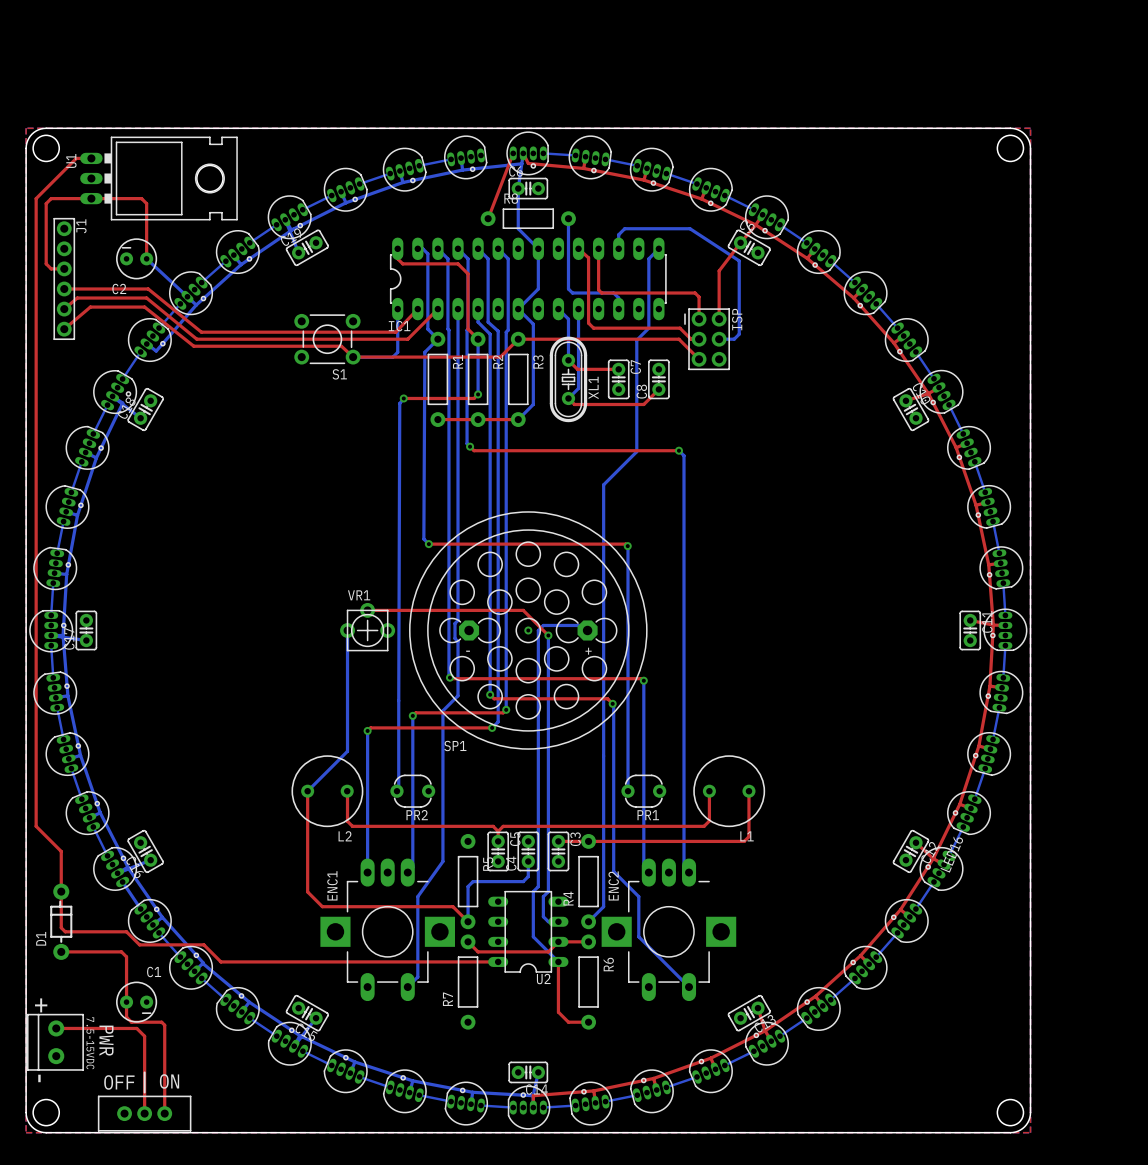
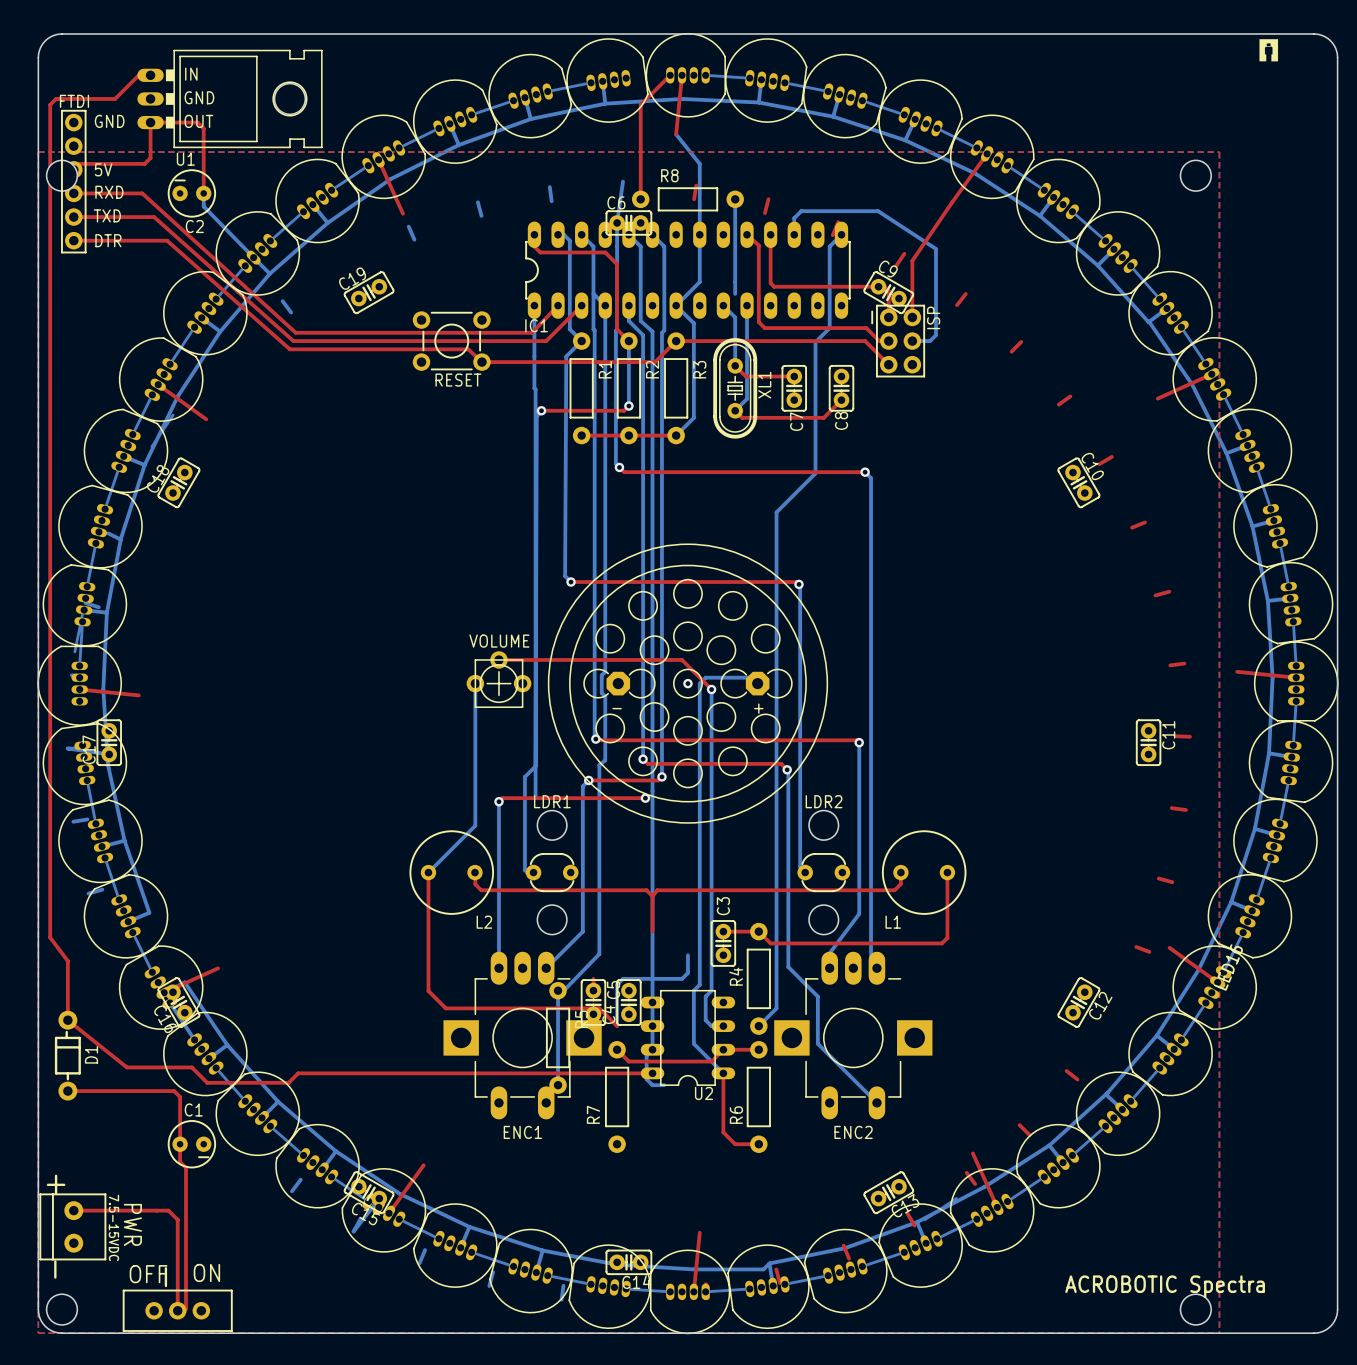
drawing: none -> [1259, 39, 1279, 62]
text: none -> IN (191, 74)
top track: none -> (670, 75) (640, 104) (640, 199)
top track: none -> (682, 75) (676, 134)
part: none -> (685, 75)
bottom track: none -> (705, 75) (749, 78)
bottom track: none -> (761, 79) (758, 102)
part: none -> (607, 80)
part: none -> (766, 80)
bottom track: none -> (602, 81) (605, 103)
bottom track: none -> (591, 82) (547, 91)
bottom track: none -> (784, 82) (828, 91)
bottom track: none -> (839, 94) (833, 116)
part: none -> (530, 96)
part: none -> (844, 96)
bottom track: none -> (524, 97) (530, 119)
text: none -> GND (199, 97)
bottom track: none -> (513, 100) (471, 114)
bottom track: none -> (862, 100) (904, 114)
bottom track: none -> (758, 102) (833, 116)
bottom track: none -> (758, 102) (682, 98) (605, 103)
bottom track: none -> (605, 103) (530, 119)
bottom track: none -> (833, 116) (905, 140)
bottom track: none -> (530, 119) (458, 145)
bottom track: none -> (915, 119) (905, 140)
text: none -> GND (109, 121)
text: none -> OUT (198, 121)
part: none -> (455, 121)
part: none -> (920, 121)
bottom track: none -> (449, 123) (458, 145)
bottom track: none -> (438, 128) (399, 147)
bottom track: none -> (937, 128) (976, 147)
bottom track: none -> (676, 134) (699, 163) (699, 282) (676, 305) (693, 323) (693, 417) (676, 435)
bottom track: none -> (905, 140) (974, 173) (1039, 215)
bottom track: none -> (458, 145) (390, 179) (327, 222)
top track: none -> (987, 153) (912, 260) (912, 317)
part: none -> (383, 156)
part: none -> (992, 156)
top track: none -> (378, 159) (403, 213)
bottom track: none -> (368, 165) (331, 190)
bottom track: none -> (1007, 165) (1044, 190)
top track: none -> (73, 169) (79, 163) (144, 163) (150, 158) (150, 122) (197, 122) (203, 128) (203, 193)
text: none -> 5V (103, 169)
board edge: (26, 148) (27, 140) (31, 134) (38, 129) (46, 128) (1010, 128) (1018, 129) (1024, 134) (1028, 140) (1030, 148) (1030, 1112) (1028, 1120) (1024, 1126) (1018, 1131) (1010, 1132) -> (38, 175) (38, 54) (45, 40) (58, 34) (1313, 33) (1322, 35) (1330, 40) (1335, 48) (1337, 57) (1337, 1312) (1330, 1326) (1317, 1333) (1195, 1333)
FTDI: none -> (73, 181)
top track: (513, 153) (488, 218) -> none
top track: (523, 153) (528, 163) (583, 168) (644, 180) (701, 199) (755, 224) (807, 258) (853, 298) (893, 343) (928, 393) -> none
part: (527, 153) -> none
bottom track: (543, 153) (575, 155) -> none
part: (465, 157) -> none
part: (590, 157) -> none
top track: (91, 158) (76, 158) (36, 198) -> (150, 75) (138, 75) (115, 98) (56, 98) (50, 104) (50, 234)
bottom track: (451, 159) (419, 165) -> none
bottom track: (605, 159) (637, 165) -> none
U1 name rotation: 0° (71, 160) -> 90° clockwise (185, 159)
U1 name position: U1 (71, 160) -> U1 (185, 159)
text: none -> RXD (109, 192)
top track: none -> (73, 193) (142, 193) (295, 332) (532, 332) (558, 305)
bottom track: none -> (203, 193) (203, 206) (269, 273)
bottom track: (521, 163) (462, 170) (402, 182) (345, 202) (291, 230) (285, 219) (298, 252) -> none
bottom track: none -> (1053, 197) (1039, 215)
part: none -> (317, 200)
part: (404, 169) -> none
part: (651, 169) -> none
part: none -> (1058, 201)
bottom track: none -> (312, 204) (327, 222)
bottom track: (390, 173) (359, 183) -> none
bottom track: (666, 173) (696, 183) -> none
U1 position: (158, 178) -> (229, 98)
bottom track: none -> (303, 211) (270, 240)
bottom track: none -> (1072, 211) (1105, 240)
text: none -> TXD (107, 215)
bottom track: none -> (1039, 215) (1097, 265)
top track: none -> (73, 217) (154, 217) (293, 341) (546, 341) (581, 305)
bottom track: none -> (327, 222) (269, 273)
part: (345, 189) -> none
part: (710, 189) -> none
bottom track: (331, 195) (302, 209) -> none
bottom track: (724, 195) (753, 209) -> none
bottom track: none -> (581, 234) (593, 246) (595, 739)
bottom track: none -> (652, 234) (664, 246) (664, 330) (661, 332) (661, 776)
bottom track: none -> (794, 234) (794, 218) (801, 211) (878, 211) (935, 248) (935, 335) (930, 341) (912, 341)
top track: none -> (73, 240) (167, 240) (289, 349) (468, 349) (481, 362) (655, 362) (676, 341) (865, 341) (888, 364)
text: none -> DTR (108, 240)
bottom track: none -> (1113, 249) (1097, 265)
part: none -> (257, 253)
part: none -> (1118, 253)
part: (289, 217) -> none
part: (766, 217) -> none
R8 position: (528, 218) -> (687, 199)
bottom track: (568, 218) (568, 288) (572, 293) (613, 293) (618, 298) -> (723, 305) (735, 317) (735, 351)
bottom track: (276, 224) (249, 242) -> none
bottom track: (780, 224) (806, 242) -> none
bottom track: none -> (1097, 265) (1148, 322) (1166, 308)
bottom track: none -> (245, 265) (216, 299)
top track: (755, 225) (719, 270) (719, 319) -> none
bottom track: none -> (1130, 265) (1159, 299)
bottom track: (518, 228) (538, 248) -> (628, 234) (640, 246) (640, 293)
bottom track: none -> (617, 270) (615, 463) (619, 467)
bottom track: (293, 229) (241, 264) (196, 305) -> none
bottom track: none -> (269, 273) (220, 331)
bottom track: (618, 234) (624, 228) (690, 228) (739, 260) (739, 334) (734, 339) (719, 339) -> (735, 277) (735, 199)
top track: (397, 248) (397, 258) (402, 263) (458, 263) (468, 273) (468, 329) (478, 339) -> (534, 234) (534, 246) (540, 252) (605, 252) (617, 264) (617, 329) (628, 341)
bottom track: (417, 248) (422, 248) (427, 253) (427, 329) (437, 339) (424, 352) (423, 539) (428, 544) -> (558, 234) (563, 234) (569, 240) (569, 329) (581, 341) (566, 356) (565, 576) (571, 582)
bottom track: (437, 248) (447, 258) -> none
bottom track: (458, 248) (468, 258) (467, 443) (470, 446) -> none
bottom track: (478, 248) (488, 258) (488, 322) (498, 331) (498, 721) (492, 727) -> none
top track: (578, 248) (588, 257) (588, 323) (593, 328) (679, 328) (691, 339) (699, 339) -> (747, 234) (758, 245) (758, 322) (764, 328) (866, 328) (879, 341) (888, 341)
top track: (598, 248) (598, 290) (601, 293) (695, 293) (699, 297) (699, 319) -> (770, 234) (770, 283) (774, 286) (884, 286) (888, 291) (888, 317)
bottom track: (658, 248) (648, 258) (648, 328) (636, 340) (636, 451) (603, 484) (603, 906) (588, 921) -> (841, 234) (829, 246) (829, 328) (815, 342) (815, 473) (776, 512) (776, 1008) (758, 1026)
part: (237, 252) -> none
part: (818, 252) -> none
C2 position: (136, 258) -> (191, 193)
top track: (146, 258) (146, 203) (141, 198) (51, 198) (46, 203) (46, 263) (51, 268) (64, 268) -> none
bottom track: (146, 258) (196, 305) -> none
bottom track: (225, 261) (201, 282) -> none
bottom track: (830, 261) (854, 282) -> none
part: none -> (205, 313)
part: none -> (1170, 313)
bottom track: none -> (201, 317) (220, 331)
bottom track: (538, 271) (538, 288) (518, 309) (533, 324) (533, 404) (518, 419) -> (640, 321) (652, 331) (652, 748)
bottom track: none -> (1149, 321) (1192, 384) (1226, 453)
bottom track: none -> (194, 327) (170, 364)
bottom track: none -> (1181, 327) (1205, 364)
J1: (64, 278) -> none
IC1 position: (528, 278) -> (687, 270)
bottom track: none -> (220, 331) (177, 396) (144, 465)
top track: (64, 288) (148, 288) (201, 332) (395, 332) (417, 309) -> none
C2 name position: C2 (119, 288) -> C2 (194, 226)
RESET: none -> (451, 341)
part: (191, 293) -> none
part: (865, 293) -> none
bottom track: (180, 303) (159, 328) -> none
bottom track: (876, 303) (897, 328) -> none
bottom track: (196, 305) (156, 351) (146, 344) -> none
top track: (64, 309) (77, 298) (146, 298) (196, 339) (407, 339) (437, 309) -> none
bottom track: (397, 309) (397, 352) (392, 357) (353, 357) -> none
bottom track: (458, 309) (458, 620) (454, 623) (454, 638) (458, 641) (458, 695) (442, 710) (442, 861) (417, 896) (417, 977) (407, 987) -> none
bottom track: (478, 309) (478, 322) (490, 334) (490, 694) -> (628, 305) (628, 321) (643, 335) (643, 759)
bottom track: (558, 309) (568, 319) (568, 360) -> none
bottom track: (578, 309) (578, 388) (568, 398) -> (747, 305) (747, 398) (735, 410)
top track: none -> (1211, 374) (1157, 398)
part: none -> (161, 379)
part: none -> (1214, 379)
top track: none -> (158, 384) (206, 419)
top track: (64, 329) (90, 307) (144, 307) (193, 346) (341, 346) (353, 357) (500, 357) (518, 339) (678, 339) (699, 359) -> none
bottom track: (508, 330) (506, 332) (506, 709) -> (605, 389) (605, 671) (601, 675) (601, 693) (605, 696) (605, 760) (599, 765) (599, 954) (558, 996) (558, 1043)
bottom track: none -> (152, 394) (132, 434)
bottom track: none -> (1223, 394) (1243, 434)
S1: (327, 339) -> none
bottom track: (478, 339) (478, 394) -> (628, 341) (628, 406)
ISP position: (707, 339) -> (898, 341)
part: (149, 340) -> none
part: (906, 340) -> none
via: none -> (628, 406)
bottom track: none -> (541, 410) (536, 416) (535, 766) (524, 776) (524, 870) (527, 872) (533, 872)
via: none -> (541, 410)
bottom track: (915, 351) (933, 378) -> none
top track: (568, 360) (577, 369) (618, 369) -> (735, 365) (745, 376) (794, 376)
C7 name position: C7 (635, 367) -> C7 (796, 421)
bottom track: none -> (1247, 445) (1226, 453)
R1 position: (437, 379) -> (581, 388)
R2 position: (478, 379) -> (628, 388)
R3 position: (518, 379) -> (676, 388)
XL1 position: (568, 379) -> (735, 388)
C7 position: (618, 379) -> (794, 388)
C8 position: (658, 379) -> (841, 388)
part: none -> (126, 450)
part: none -> (1249, 450)
bottom track: none -> (1226, 453) (1252, 526)
bottom track: none -> (123, 456) (144, 465)
XL1 name position: XL1 (593, 387) -> XL1 (764, 385)
top track: (658, 389) (643, 404) (574, 404) (568, 398) -> (841, 400) (823, 417) (742, 417) (735, 410)
C8 name position: C8 (641, 391) -> C8 (841, 420)
part: (941, 391) -> none
part: (115, 392) -> none
top track: (928, 393) (956, 447) (976, 505) (988, 564) (993, 625) -> none
top track: (928, 393) (905, 400) -> none
bottom track: none -> (144, 465) (121, 538) (106, 612)
top track: (478, 394) (474, 398) (403, 398) -> (628, 406) (624, 410) (541, 410)
via: (478, 394) -> none
bottom track: none -> (119, 467) (105, 509)
via: none -> (619, 467)
bottom track: none -> (1256, 467) (1270, 509)
bottom track: (403, 398) (399, 403) (398, 789) (396, 791) -> none
via: (403, 398) -> none
via: none -> (865, 472)
bottom track: (949, 404) (963, 433) -> none
bottom track: (107, 405) (93, 433) -> none
bottom track: (140, 418) (112, 396) (122, 403) (96, 457) (77, 515) (66, 574) (63, 635) (67, 695) (80, 755) (100, 812) (89, 817) -> none
top track: (437, 419) (518, 419) -> (581, 435) (676, 435)
bottom track: none -> (1273, 520) (1252, 526)
part: none -> (100, 526)
top track: (470, 446) (474, 450) (678, 450) -> (619, 467) (624, 472) (865, 472)
via: (470, 446) -> none
bottom track: none -> (1252, 526) (1267, 600)
part: none -> (1275, 525)
part: (87, 447) -> none
part: (969, 447) -> none
bottom track: (678, 450) (683, 455) (683, 867) (689, 872) -> (865, 472) (871, 478) (871, 962) (876, 968)
via: (678, 450) -> none
bottom track: none -> (95, 543) (87, 586)
bottom track: (81, 461) (71, 492) -> none
bottom track: (974, 461) (985, 492) -> none
bottom track: none -> (1280, 543) (1288, 586)
part footprint: [45, 485, 90, 529] -> [42, 564, 128, 647]
top track: none -> (571, 582) (796, 582) (798, 584)
via: none -> (571, 582)
bottom track: none -> (798, 584) (800, 866) (805, 872)
via: none -> (798, 584)
part: (989, 506) -> none
bottom track: none -> (1290, 598) (1267, 600)
bottom track: none -> (1267, 600) (1272, 677) (1269, 753)
part: none -> (1291, 603)
bottom track: none -> (84, 610) (106, 612)
bottom track: none -> (106, 612) (103, 689) (108, 765) (124, 840)
bottom track: (993, 521) (999, 553) -> none
bottom track: none -> (82, 621) (79, 665)
bottom track: none -> (1293, 621) (1296, 665)
top track: (428, 544) (625, 544) (627, 546) -> none
via: (428, 544) -> none
bottom track: (627, 546) (628, 791) -> none
via: (627, 546) -> none
part: (1001, 567) -> none
part: (55, 568) -> none
top track: none -> (1237, 671) (1296, 677)
VOLUME: none -> (498, 679)
part: none -> (1296, 681)
part: none -> (687, 683)
via: none -> (687, 683)
part: none -> (79, 685)
bottom track: (53, 583) (51, 615) -> none
bottom track: (1003, 583) (1005, 615) -> none
top track: none -> (79, 689) (138, 695)
bottom track: none -> (711, 689) (711, 990) (705, 996) (705, 1020) (711, 1026) (723, 1026)
via: none -> (711, 689)
bottom track: none -> (1296, 701) (1293, 745)
top track: (367, 610) (523, 610) (548, 635) -> (498, 659) (682, 659) (711, 689)
top track: (970, 620) (993, 625) -> none
top track: (993, 625) (989, 686) (978, 746) (959, 804) (933, 859) -> none
VR1: (367, 627) -> none
top track: none -> (595, 739) (856, 740) (859, 742)
via: none -> (595, 739)
part: (1005, 629) -> none
bottom track: (347, 630) (347, 751) (307, 791) -> (475, 683) (475, 825) (428, 872)
SP1: (528, 630) -> none
via: (528, 630) -> none
bottom track: (587, 630) (582, 625) (543, 625) (538, 630) (538, 886) (533, 891) (533, 936) (558, 961) -> (757, 683) (751, 677) (705, 677) (699, 683) (699, 984) (693, 990) (693, 1043) (723, 1073)
bottom track: none -> (859, 742) (859, 913) (823, 961) (829, 962) (829, 968)
via: none -> (859, 742)
part: (51, 631) -> none
via: (548, 635) -> none
bottom track: none -> (1269, 753) (1291, 757)
bottom track: none -> (1269, 753) (1254, 828)
via: none -> (643, 759)
bottom track: (51, 645) (53, 677) -> none
bottom track: (1005, 645) (1003, 677) -> none
part: none -> (1291, 761)
part: none -> (84, 764)
top track: none -> (661, 776) (658, 780) (588, 780)
via: none -> (661, 776)
bottom track: none -> (87, 780) (95, 823)
bottom track: none -> (588, 780) (582, 786) (582, 931) (546, 968)
via: none -> (588, 780)
bottom track: none -> (1288, 780) (1280, 823)
top track: (449, 677) (641, 678) (643, 680) -> none
via: (449, 677) -> none
via: none -> (645, 798)
via: none -> (498, 801)
bottom track: (643, 680) (643, 867) (648, 872) -> none
via position: (643, 680) -> (787, 769)
round board edge: none -> [537, 810, 568, 841]
round board edge: none -> [808, 810, 839, 841]
part: (1001, 692) -> none
part: (55, 693) -> none
top track: (490, 694) (494, 698) (607, 698) (612, 703) -> (643, 759) (647, 763) (781, 763) (787, 769)
via: (490, 694) -> none
bottom track: (612, 703) (613, 871) (638, 896) (638, 936) (689, 987) -> (787, 769) (788, 967) (817, 996) (817, 1043) (876, 1102)
via: (612, 703) -> none
bottom track: none -> (1254, 828) (1276, 835)
bottom track: none -> (1254, 828) (1231, 902)
bottom track: (57, 707) (63, 739) -> none
bottom track: (999, 707) (993, 739) -> none
top track: (506, 709) (503, 712) (415, 712) (412, 715) -> none
via: (506, 709) -> none
bottom track: none -> (124, 840) (102, 846)
bottom track: none -> (124, 840) (149, 912) (128, 921)
part: none -> (1275, 840)
part: none -> (100, 841)
bottom track: (412, 715) (412, 867) (407, 872) -> none
via: (412, 715) -> none
top track: (492, 727) (370, 727) (367, 730) -> (645, 798) (502, 798) (498, 801)
via: (492, 727) -> none
bottom track: none -> (105, 858) (119, 899)
bottom track: none -> (1270, 858) (1256, 899)
bottom track: (367, 730) (367, 872) -> (498, 801) (498, 968)
via: (367, 730) -> none
top track: none -> (475, 872) (475, 884) (481, 890) (646, 890) (652, 896)
LDR1: none -> (552, 872)
LDR2: none -> (823, 872)
top track: none -> (900, 872) (900, 884) (894, 890) (657, 890) (652, 896)
top track: none -> (947, 872) (947, 937) (941, 943) (770, 943) (758, 931) (723, 931)
part: (989, 753) -> none
part: (67, 754) -> none
top track: none -> (652, 896) (652, 931)
bottom track: none -> (1231, 902) (1252, 910)
bottom track: none -> (1231, 902) (1198, 970) (1156, 1035)
bottom track: (71, 768) (81, 799) -> none
round board edge: none -> [537, 904, 568, 935]
round board edge: none -> [808, 904, 839, 935]
bottom track: (985, 768) (974, 799) -> none
part: none -> (125, 916)
top track: (307, 791) (307, 891) (322, 906) (452, 906) (468, 921) -> (428, 872) (428, 991) (445, 1008) (599, 1008) (617, 1026)
L2 position: (327, 791) -> (451, 872)
top track: (347, 791) (347, 821) (352, 826) (493, 826) (498, 831) (503, 826) (704, 826) (709, 821) (709, 791) -> none
PR2: (412, 791) -> none
PR1: (643, 791) -> none
L1 position: (729, 791) -> (924, 872)
top track: (748, 791) (748, 836) (744, 841) (558, 841) -> none
LED16 footprint: [947, 791, 991, 835] -> [1207, 874, 1293, 959]
bottom track: none -> (132, 932) (152, 972)
bottom track: none -> (1243, 932) (1223, 972)
top track: (36, 796) (36, 826) (61, 851) (61, 927) (65, 931) (126, 931) (139, 944) (203, 944) (220, 961) (498, 961) -> (50, 937) (67, 961) (67, 1020) (126, 1067) (191, 1067) (207, 1082) (288, 1082) (298, 1073) (652, 1073)
top track: none -> (1169, 947) (1217, 982)
bottom track: none -> (687, 955) (687, 972) (682, 978) (623, 978) (617, 984) (617, 1026)
bottom track: (100, 812) (127, 867) (117, 873) (150, 860) -> none
part: (87, 813) -> none
top track: none -> (218, 968) (164, 992)
bottom track: (93, 827) (107, 855) -> none
bottom track: (963, 827) (949, 855) -> none
L2 name position: L2 (345, 836) -> L2 (484, 922)
L1 name position: L1 (747, 836) -> L1 (893, 922)
part: none -> (161, 987)
part: none -> (1214, 987)
C3 name position: C3 (575, 839) -> C3 (723, 906)
top track: (916, 842) (933, 858) (944, 864) -> none
bottom track: none -> (164, 992) (184, 982) (227, 1045)
bottom track: none -> (170, 1002) (194, 1039)
C3 position: (558, 851) -> (723, 943)
bottom track: none -> (1205, 1002) (1181, 1039)
top track: (933, 858) (900, 909) (860, 955) (815, 996) (765, 1030) -> none
bottom track: (528, 861) (528, 876) (523, 881) (473, 881) (468, 886) -> none
bottom track: (127, 867) (162, 917) (152, 924) -> none
part: (115, 868) -> none
part: (941, 868) -> none
bottom track: none -> (1156, 1035) (1174, 1049)
bottom track: none -> (1156, 1035) (1106, 1094) (1122, 1109)
bottom track: (122, 881) (140, 909) -> none
R4 position: (588, 881) -> (758, 978)
bottom track: (933, 881) (915, 909) -> none
ENC1 name rotation: 0° (332, 885) -> 90° clockwise (522, 1132)
ENC1 name position: ENC1 (332, 885) -> ENC1 (522, 1132)
ENC2 name rotation: 0° (613, 885) -> 90° clockwise (853, 1132)
ENC2 name position: ENC2 (613, 885) -> ENC2 (853, 1132)
bottom track: none -> (227, 1045) (208, 1058)
bottom track: none -> (227, 1045) (278, 1101)
part: none -> (205, 1054)
part: none -> (1170, 1053)
R4 name position: R4 (568, 898) -> R4 (736, 976)
bottom track: none -> (216, 1068) (245, 1101)
bottom track: none -> (1159, 1068) (1130, 1101)
bottom track: (162, 916) (203, 962) (194, 971) -> none
part: (149, 920) -> none
part: (906, 920) -> none
D1 position: (61, 921) -> (67, 1055)
top track: none -> (67, 1091) (174, 1091) (180, 1096) (180, 1161) (185, 1167) (185, 1309)
bottom track: none -> (1107, 1093) (1049, 1145)
ENC1 position: (387, 929) -> (522, 1035)
ENC2 position: (668, 929) -> (853, 1035)
U2 position: (528, 931) -> (687, 1037)
bottom track: (159, 932) (180, 957) -> none
bottom track: (897, 932) (876, 957) -> none
bottom track: none -> (278, 1101) (261, 1117)
bottom track: none -> (278, 1101) (335, 1151)
D1 name position: D1 (41, 938) -> D1 (91, 1054)
top track: (468, 941) (478, 951) (548, 951) (558, 941) (588, 941) -> (617, 1049) (628, 1061) (711, 1061) (723, 1049) (758, 1049)
part: none -> (257, 1113)
part: none -> (1118, 1113)
top track: (61, 951) (121, 951) (126, 956) (126, 1017) (131, 1022) (161, 1022) (164, 1025) (164, 1113) -> none
bottom track: none -> (270, 1126) (303, 1155)
bottom track: none -> (1105, 1126) (1072, 1155)
top track: (558, 961) (558, 1012) (568, 1022) (588, 1022) -> (723, 1073) (723, 1132) (735, 1144) (758, 1144)
bottom track: (202, 963) (249, 1002) (299, 1035) (354, 1061) (412, 1080) (472, 1092) (533, 1095) -> none
R6 name position: R6 (608, 964) -> R6 (736, 1115)
part: (191, 967) -> none
part: (865, 967) -> none
C1 name position: C1 (154, 971) -> C1 (193, 1109)
bottom track: none -> (1049, 1145) (1063, 1162)
bottom track: none -> (1049, 1145) (984, 1186) (917, 1222)
bottom track: (201, 978) (225, 999) -> none
bottom track: none -> (335, 1151) (322, 1169)
bottom track: none -> (335, 1151) (399, 1193) (469, 1226)
bottom track: (854, 978) (830, 999) -> none
top track: none -> (972, 1153) (997, 1207)
R7 position: (468, 982) -> (617, 1096)
R6 position: (588, 982) -> (758, 1096)
top track: none -> (423, 1165) (389, 1213)
part: none -> (317, 1166)
part: none -> (1058, 1166)
bottom track: none -> (331, 1176) (368, 1201)
bottom track: none -> (1044, 1176) (1007, 1201)
C1 position: (136, 1002) -> (191, 1144)
part: (237, 1008) -> none
top track: (757, 1008) (765, 1030) -> none
part: (818, 1008) -> none
bottom track: (249, 1018) (276, 1036) -> none
part: none -> (383, 1210)
part: none -> (992, 1210)
top track: (765, 1030) (710, 1058) (653, 1078) (593, 1090) (533, 1095) (533, 1107) -> none
bottom track: none -> (399, 1219) (438, 1238)
bottom track: none -> (976, 1219) (937, 1238)
bottom track: none -> (917, 1222) (926, 1243)
bottom track: none -> (917, 1222) (845, 1248) (769, 1263)
bottom track: none -> (469, 1226) (460, 1247)
bottom track: none -> (469, 1226) (542, 1250)
part: (289, 1043) -> none
part: (766, 1043) -> none
top track: none -> (699, 1232) (693, 1291)
bottom track: (302, 1051) (331, 1065) -> none
bottom track: (753, 1051) (724, 1065) -> none
part: none -> (455, 1245)
part: none -> (920, 1245)
bottom track: none -> (542, 1250) (536, 1272)
bottom track: none -> (542, 1250) (617, 1264) (693, 1269) (763, 1269) (769, 1263)
bottom track: none -> (471, 1252) (513, 1266)
bottom track: none -> (904, 1252) (862, 1266)
part footprint: [630, 1069, 674, 1114] -> [727, 1244, 810, 1329]
part: (345, 1071) -> none
part: (710, 1071) -> none
line: (144, 1072) (144, 1092) -> none
bottom track: (538, 1072) (533, 1095) -> none
bottom track: none -> (769, 1263) (773, 1285)
bottom track: (359, 1076) (390, 1087) -> none
bottom track: (696, 1076) (666, 1087) -> none
line: none -> (165, 1268) (165, 1285)
part: none -> (531, 1271)
part: none -> (845, 1271)
bottom track: none -> (547, 1275) (591, 1284)
bottom track: none -> (828, 1275) (784, 1284)
part: (404, 1091) -> none
text: none -> ACROBOTIC Spectra (1165, 1286)
part: none -> (609, 1286)
bottom track: (419, 1095) (451, 1101) -> none
bottom track: none -> (626, 1288) (670, 1291)
bottom track: none -> (749, 1288) (705, 1291)
bottom track: (637, 1095) (605, 1101) -> none
part: none -> (690, 1291)
part: (466, 1103) -> none
part: (590, 1103) -> none
bottom track: (480, 1105) (513, 1107) -> none
bottom track: (575, 1105) (543, 1107) -> none
part: (529, 1107) -> none

